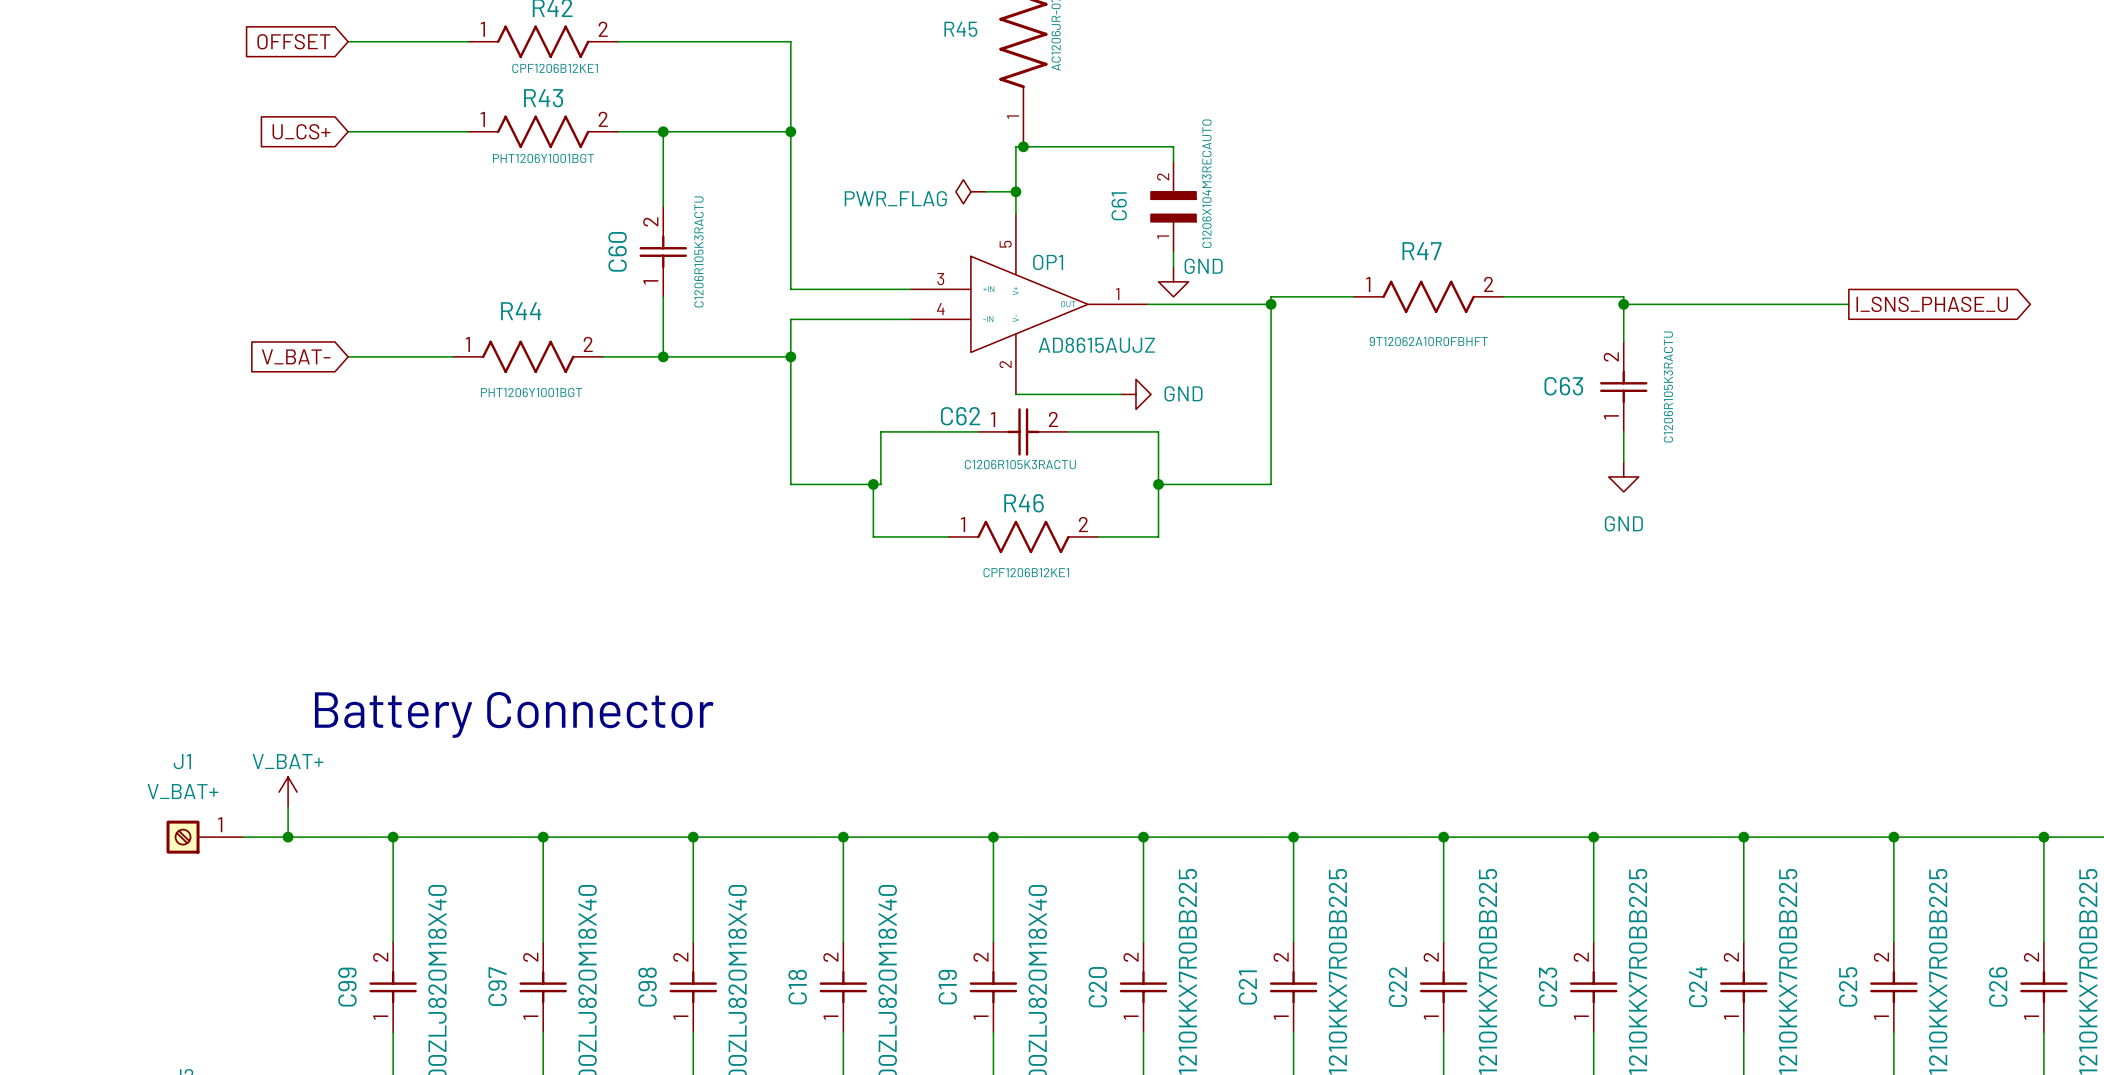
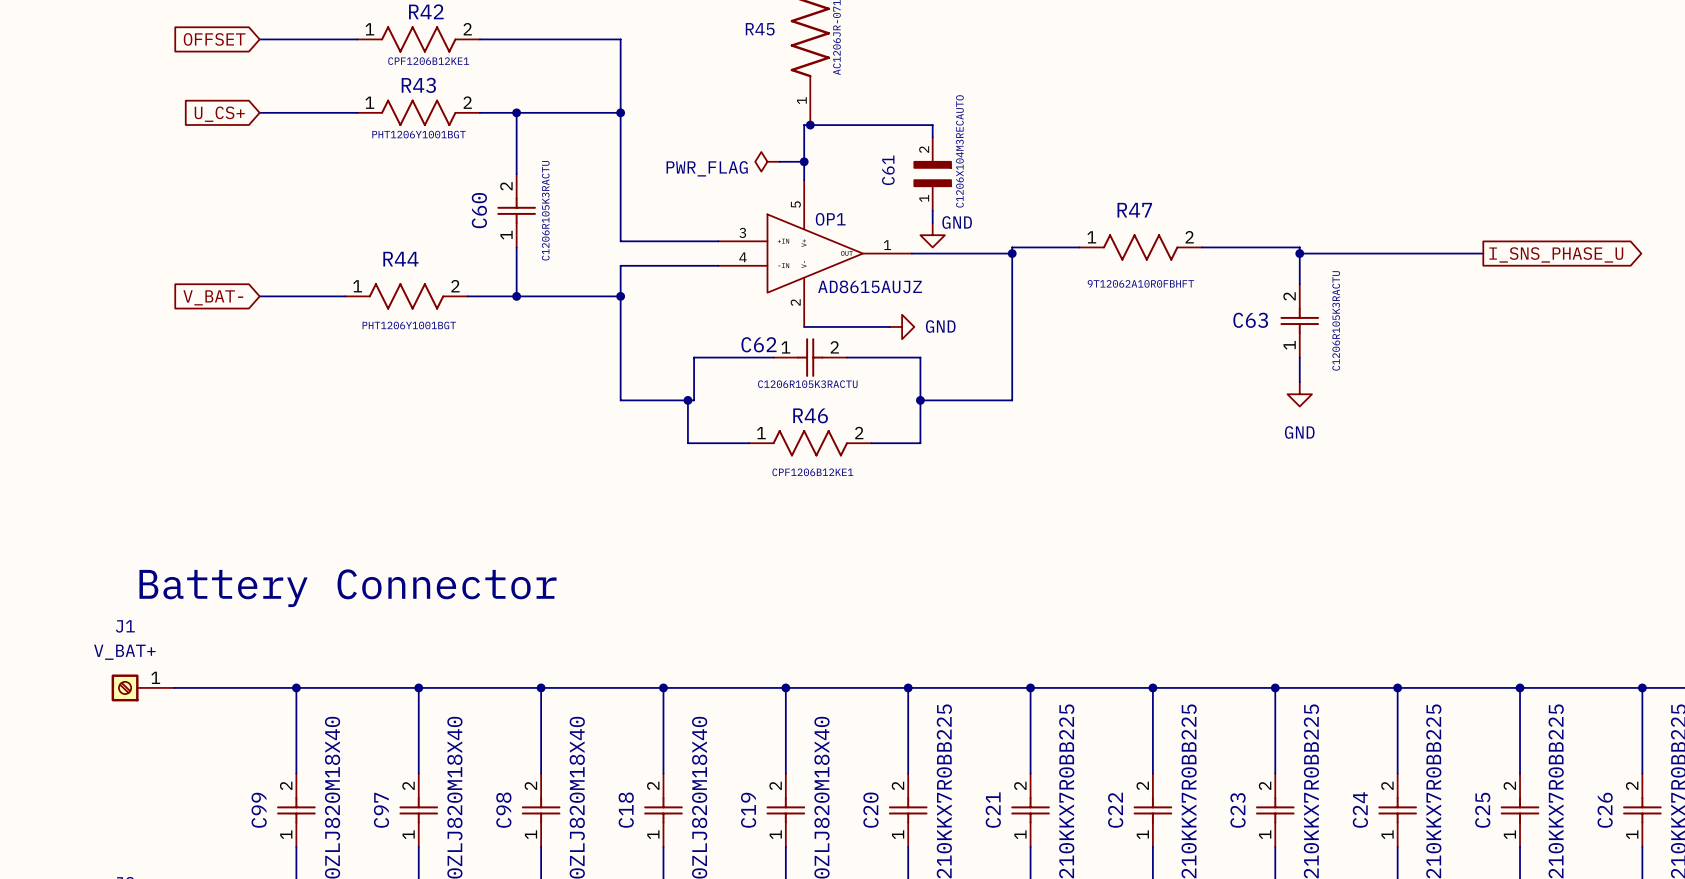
power symbol: V_BAT+ (288, 792) -> none
wire: (288, 807) (288, 837) -> none
junction: (288, 837) -> none

